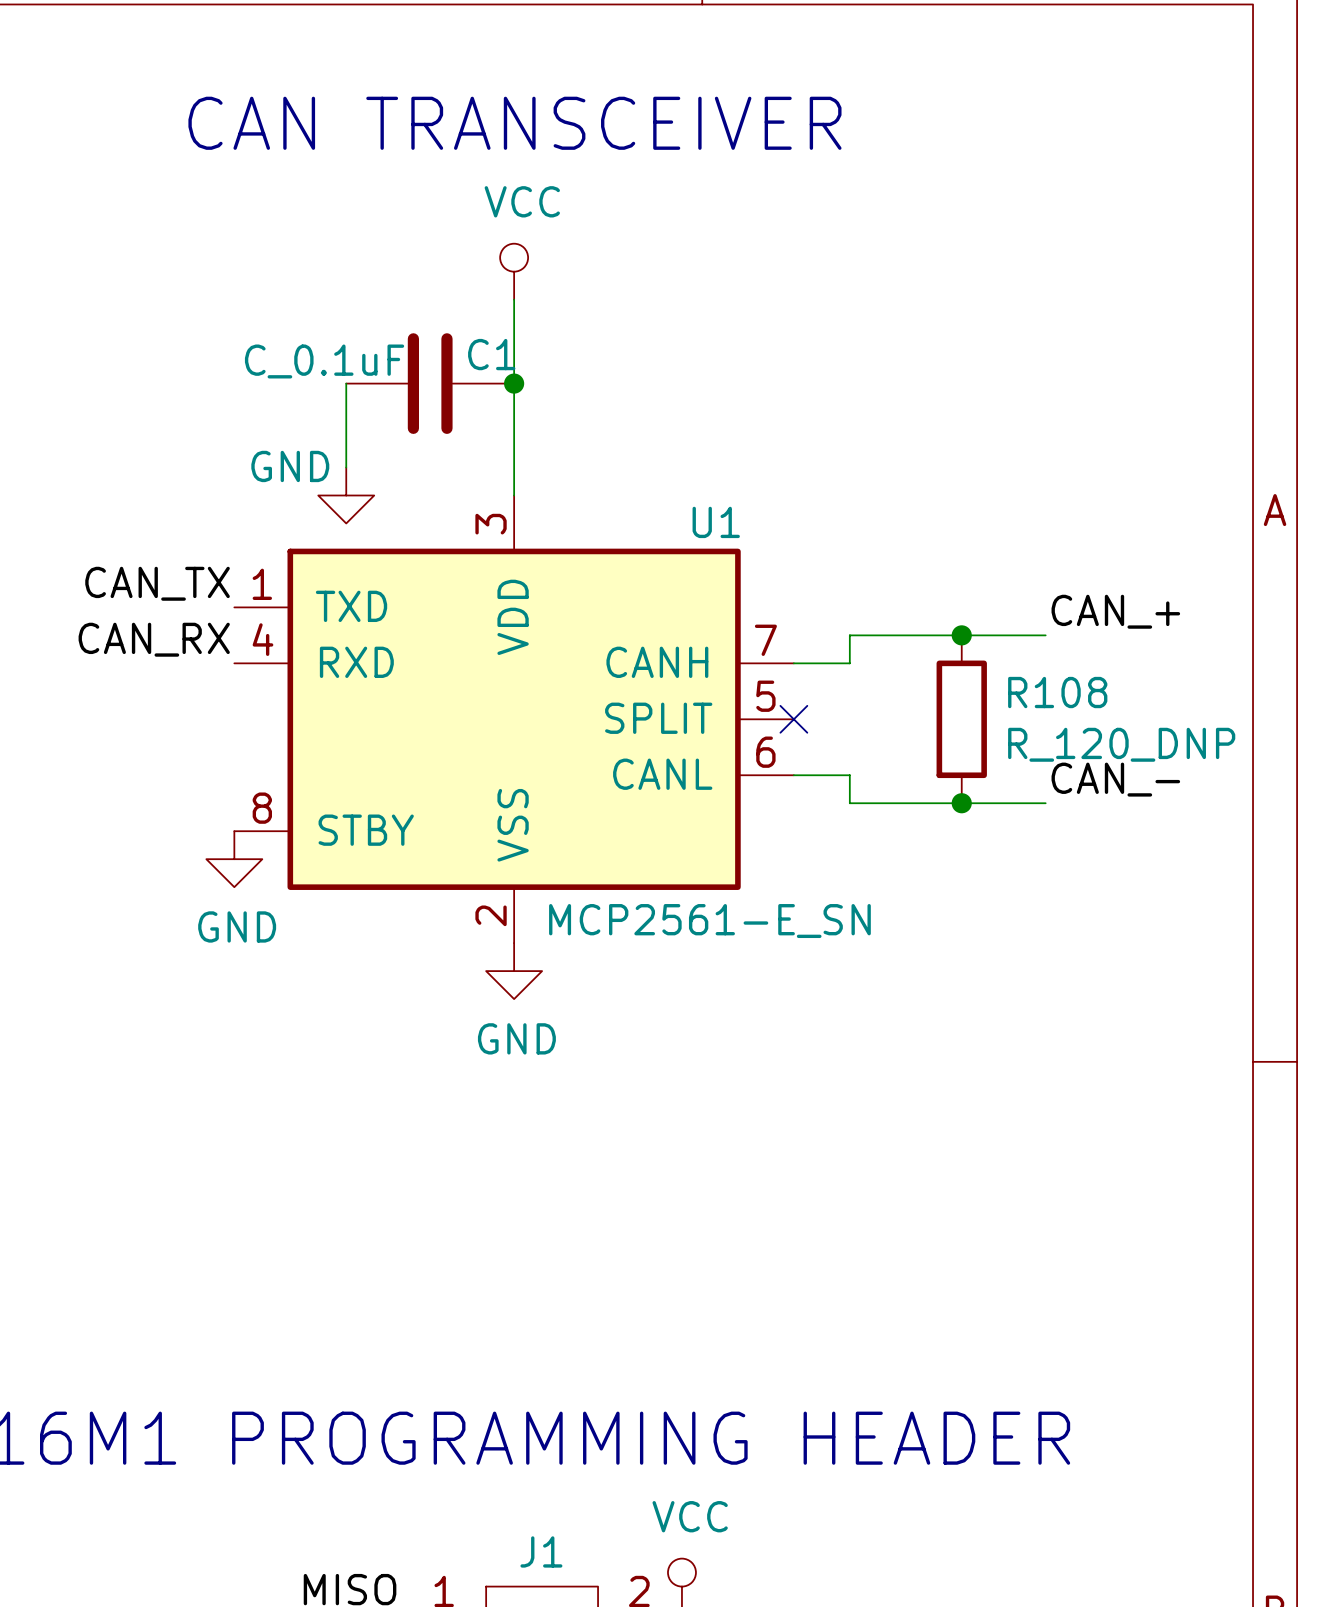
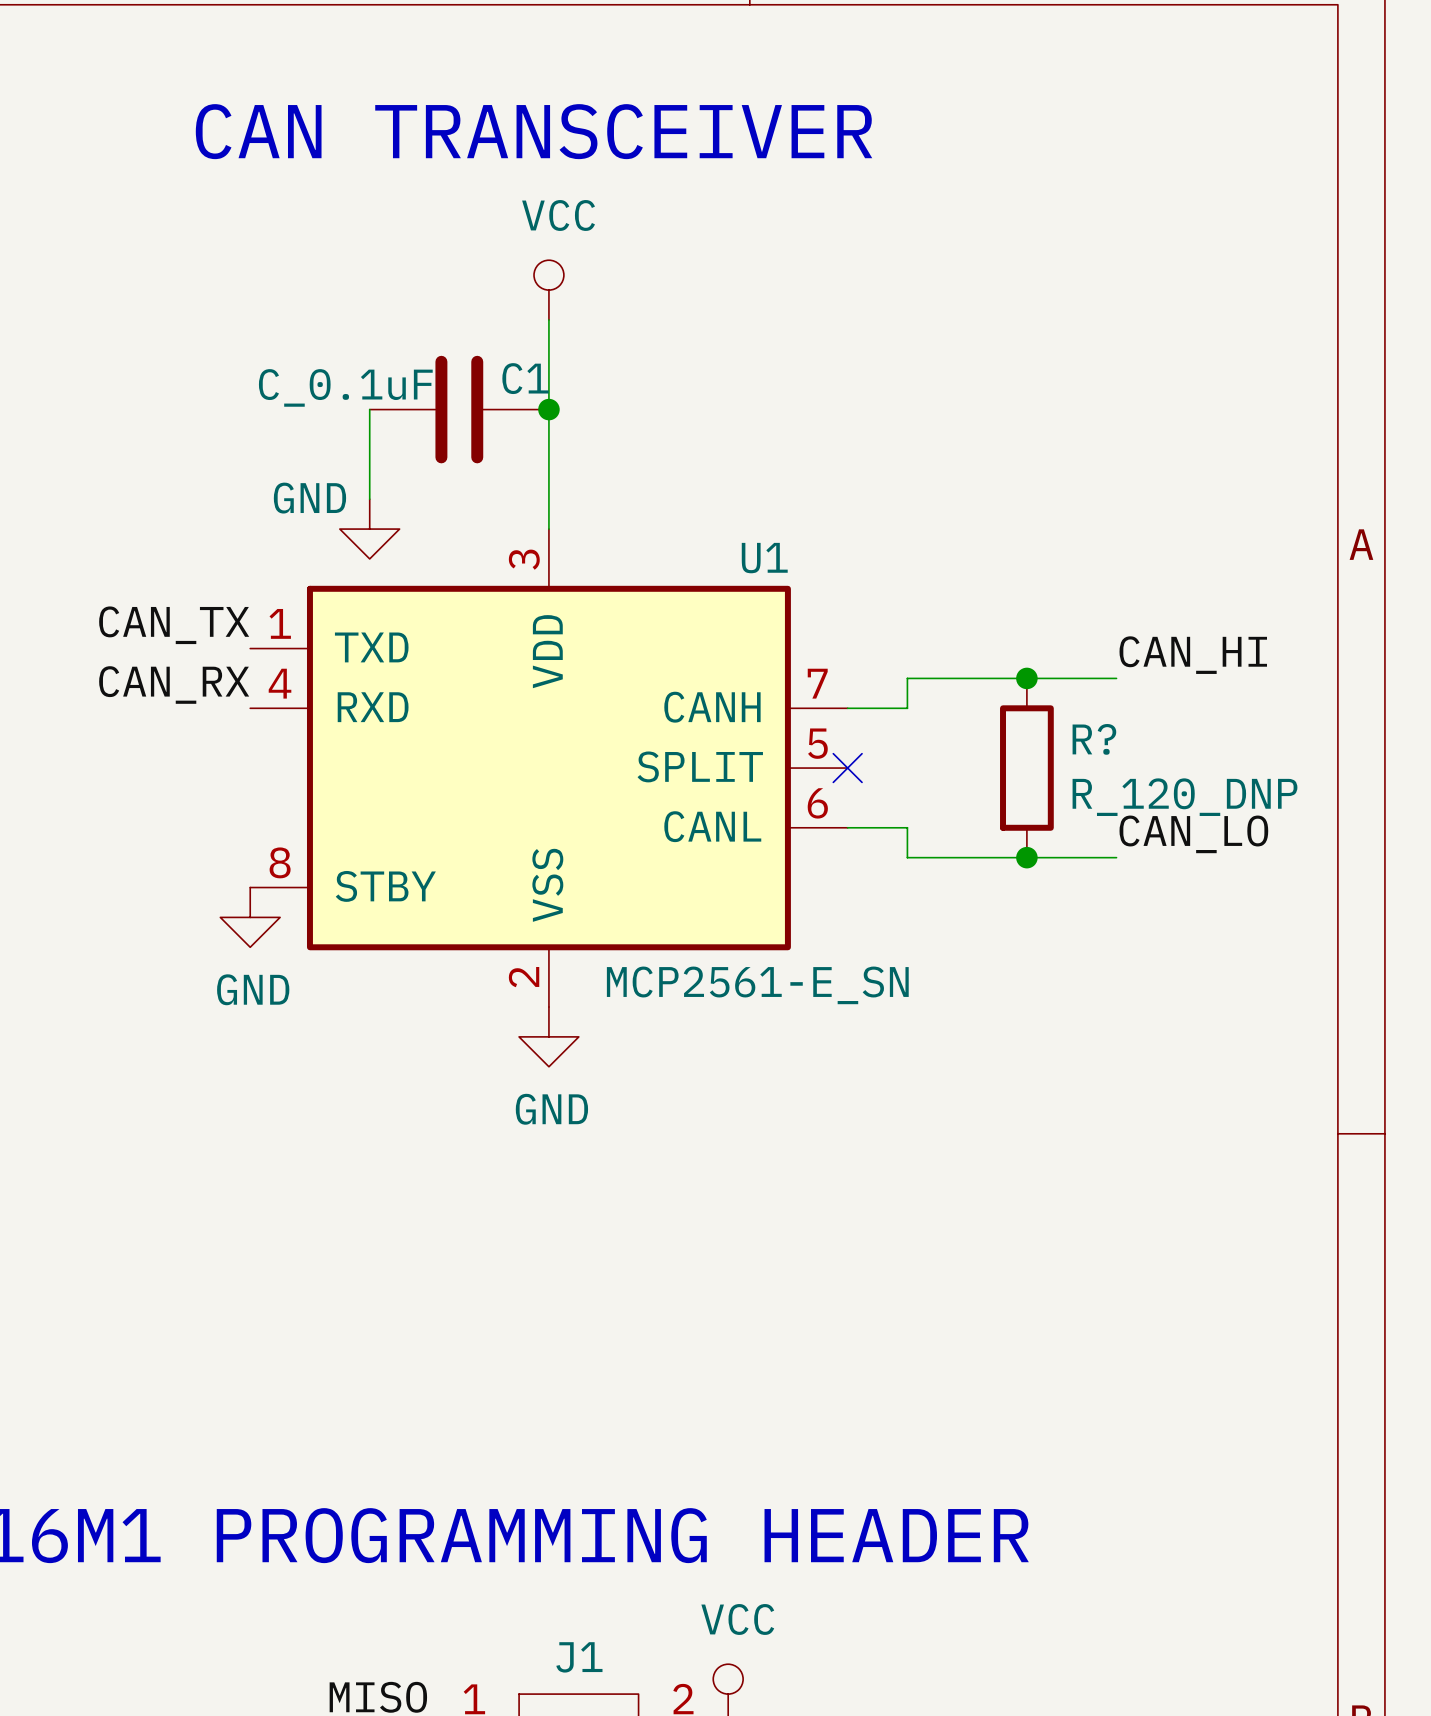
label: CAN_+ (1115, 611) -> CAN_HI (1193, 655)
R108 name: R108 (1057, 692) -> R? (1094, 739)
label: CAN_- (1115, 779) -> CAN_LO (1193, 834)

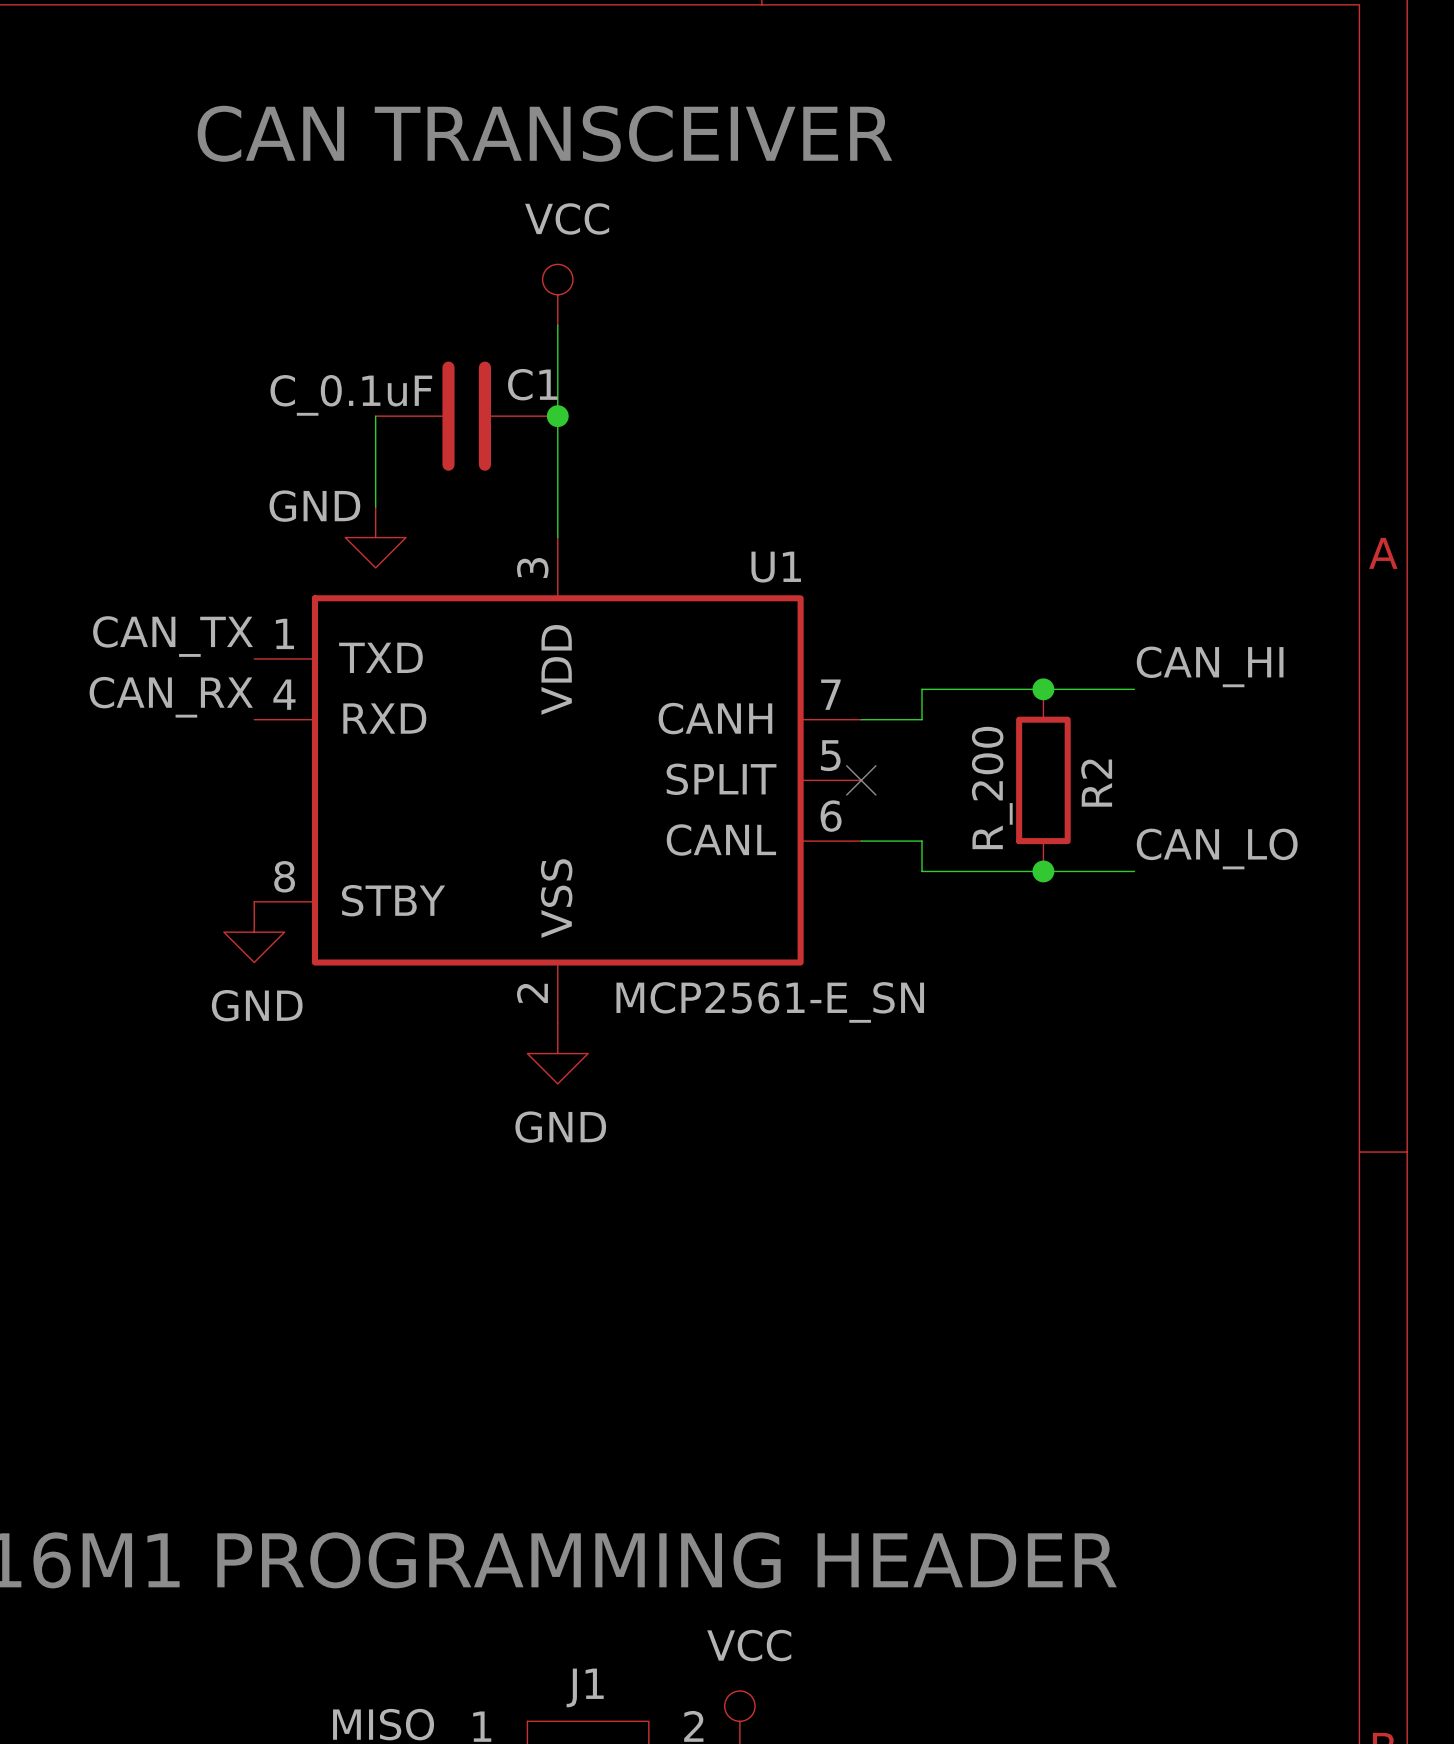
R? name: R? (1094, 739) -> R2 (1096, 783)
R? value: R_120_DNP (1184, 797) -> R_200 (992, 787)

